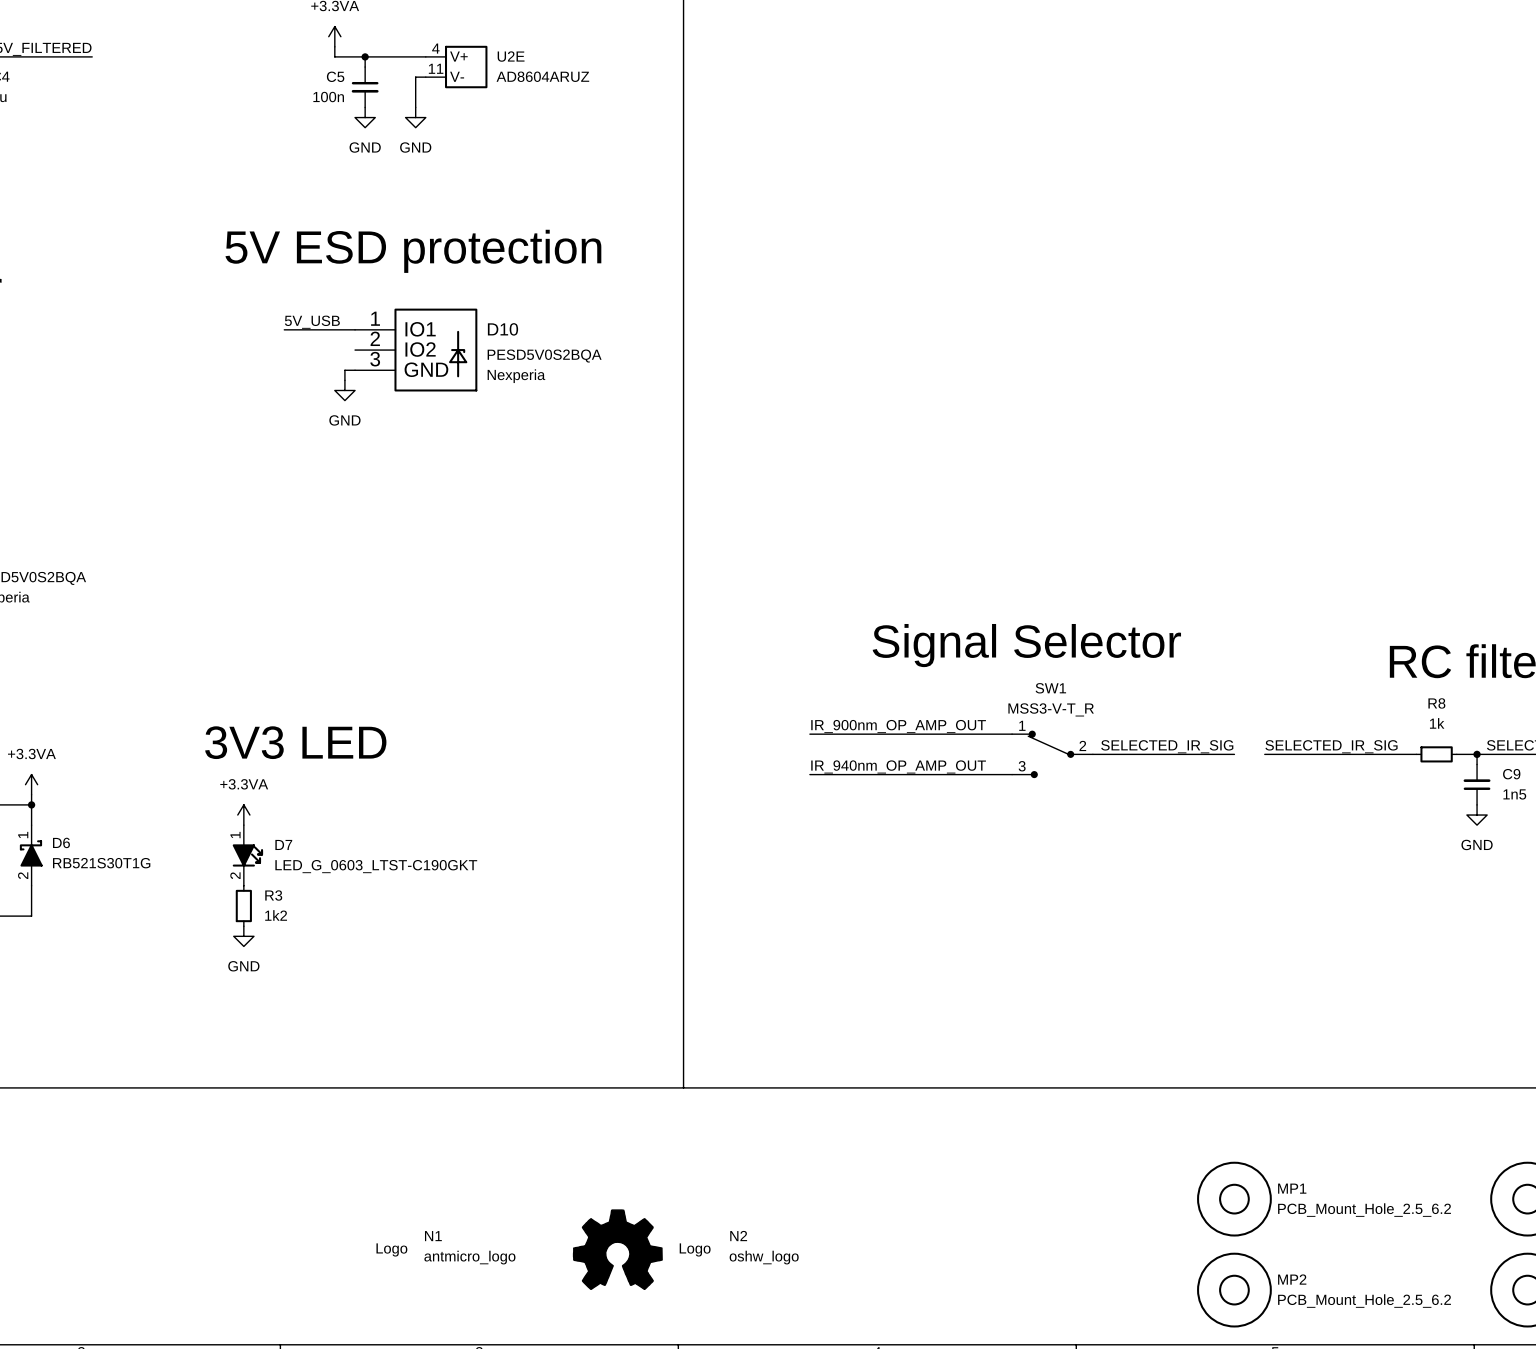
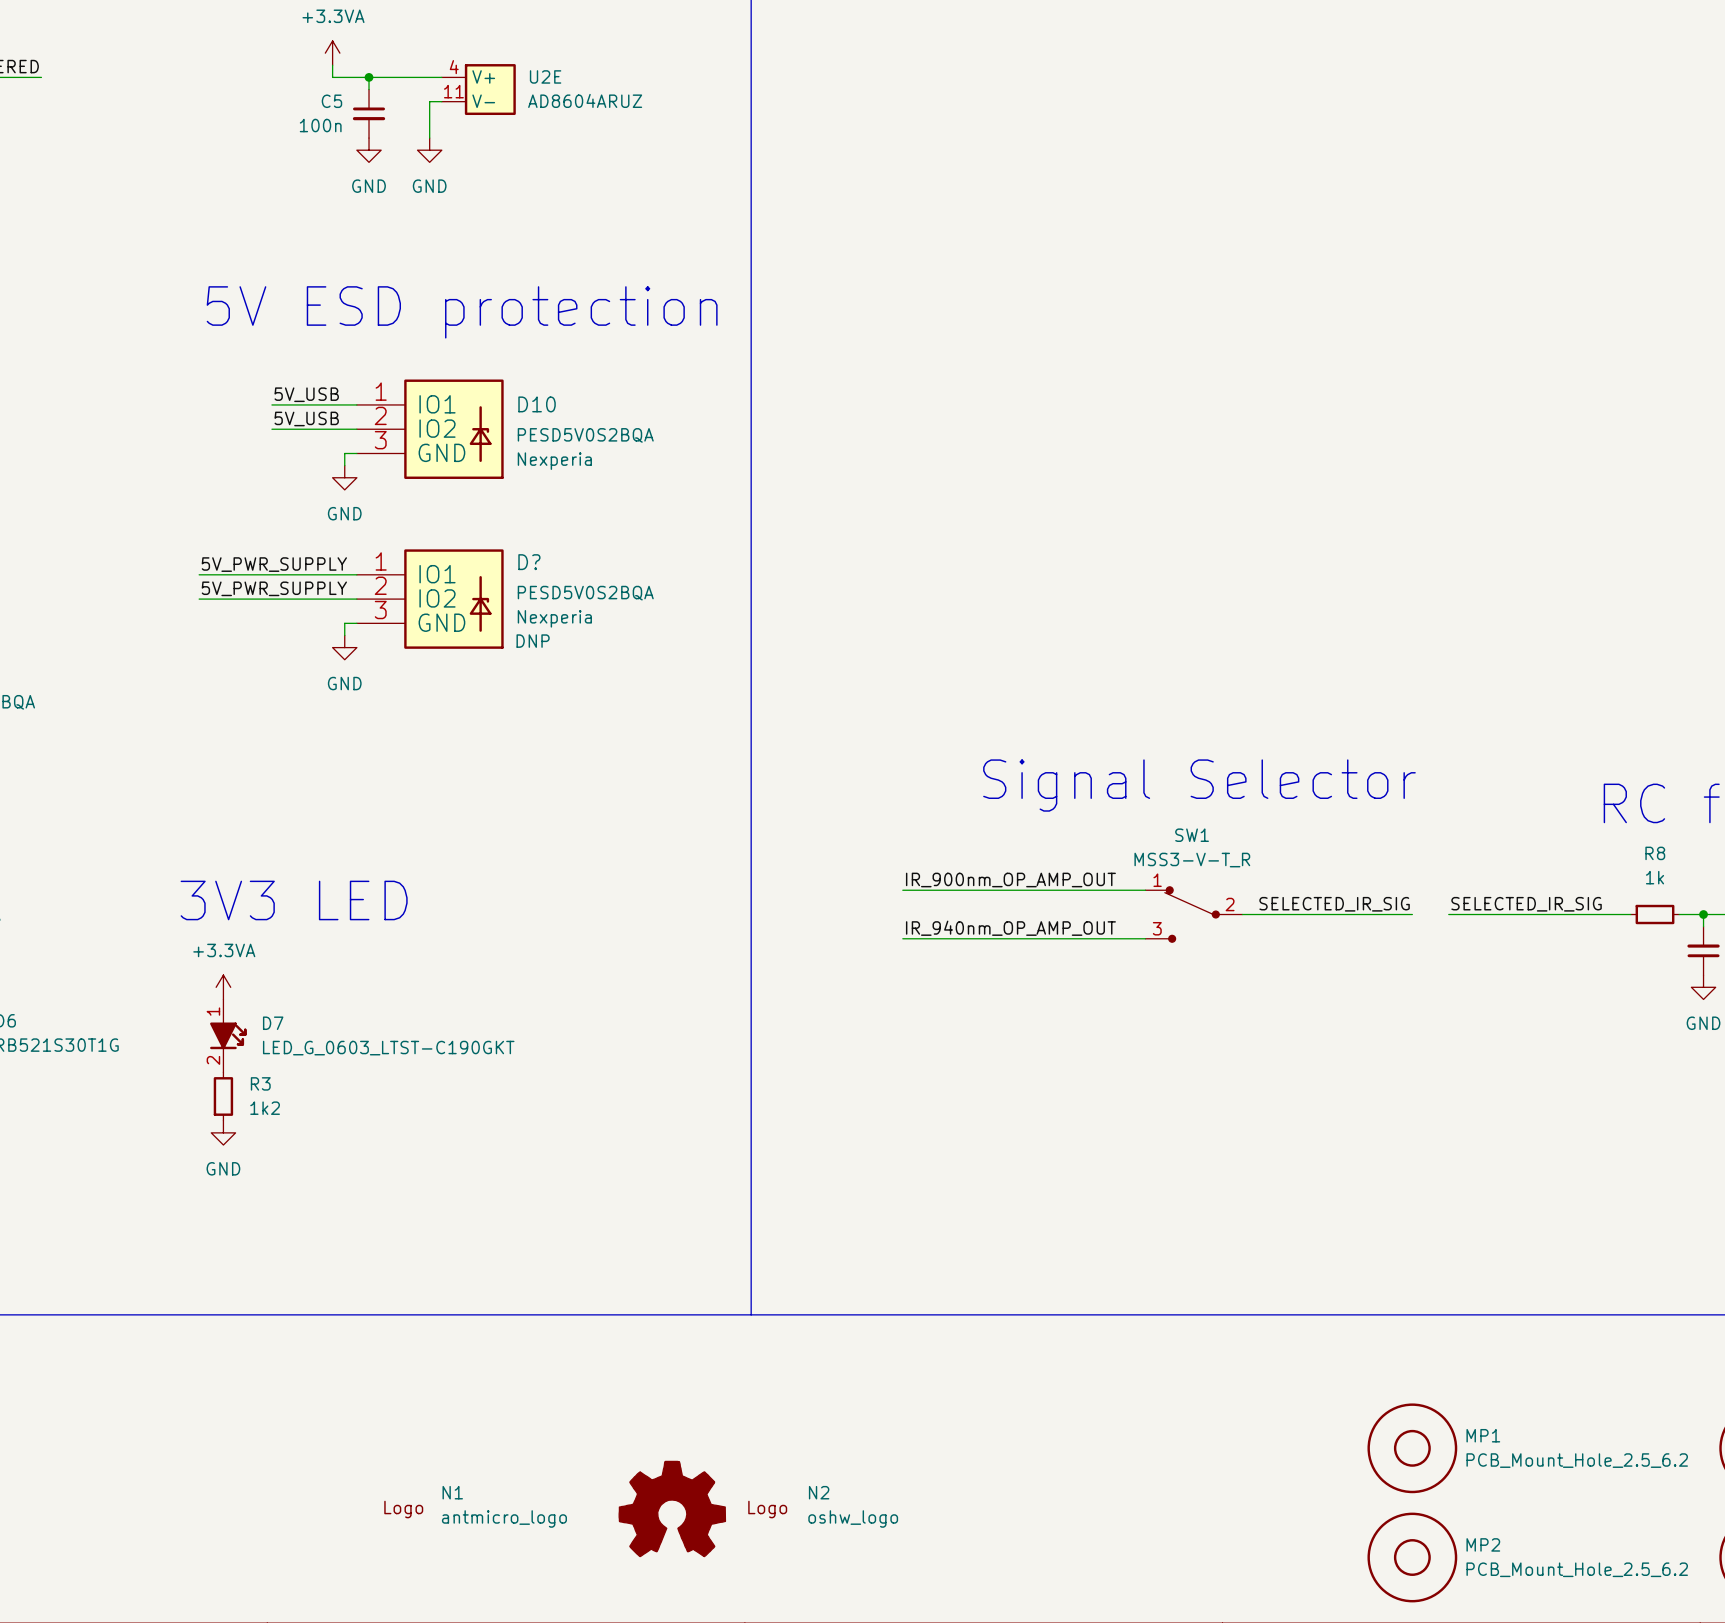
label: none -> 5V_USB (306, 418)
wire: none -> (271, 429) (356, 429)
label: none -> 5V_PWR_SUPPLY (274, 564)
wire: none -> (199, 574) (356, 574)
label: none -> 5V_PWR_SUPPLY (274, 588)
wire: none -> (199, 599) (356, 599)
D?: none -> (430, 599)
wire: none -> (356, 623) (344, 623) (344, 635)
power symbol: none -> GND (344, 647)

